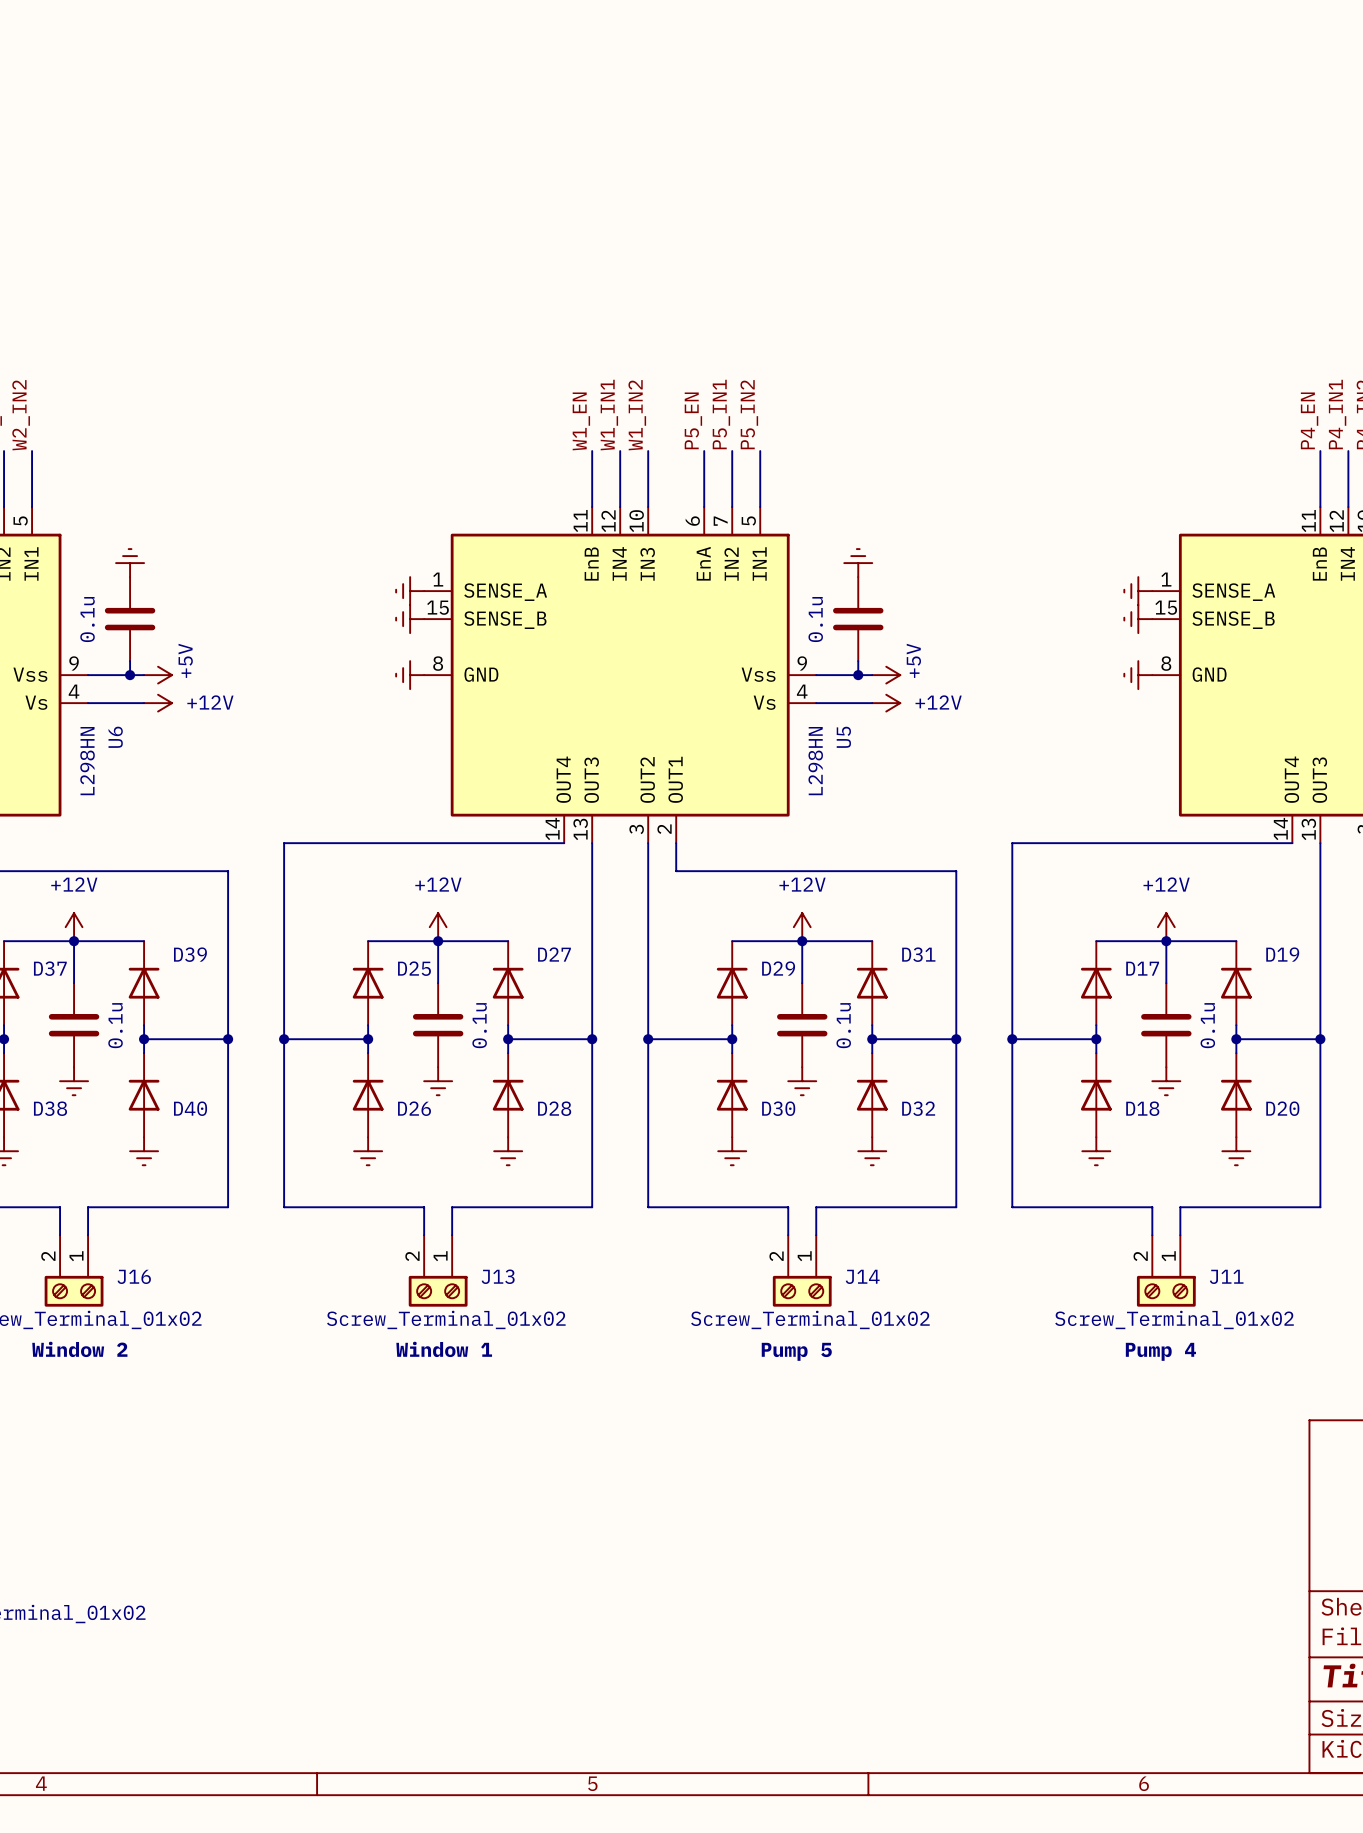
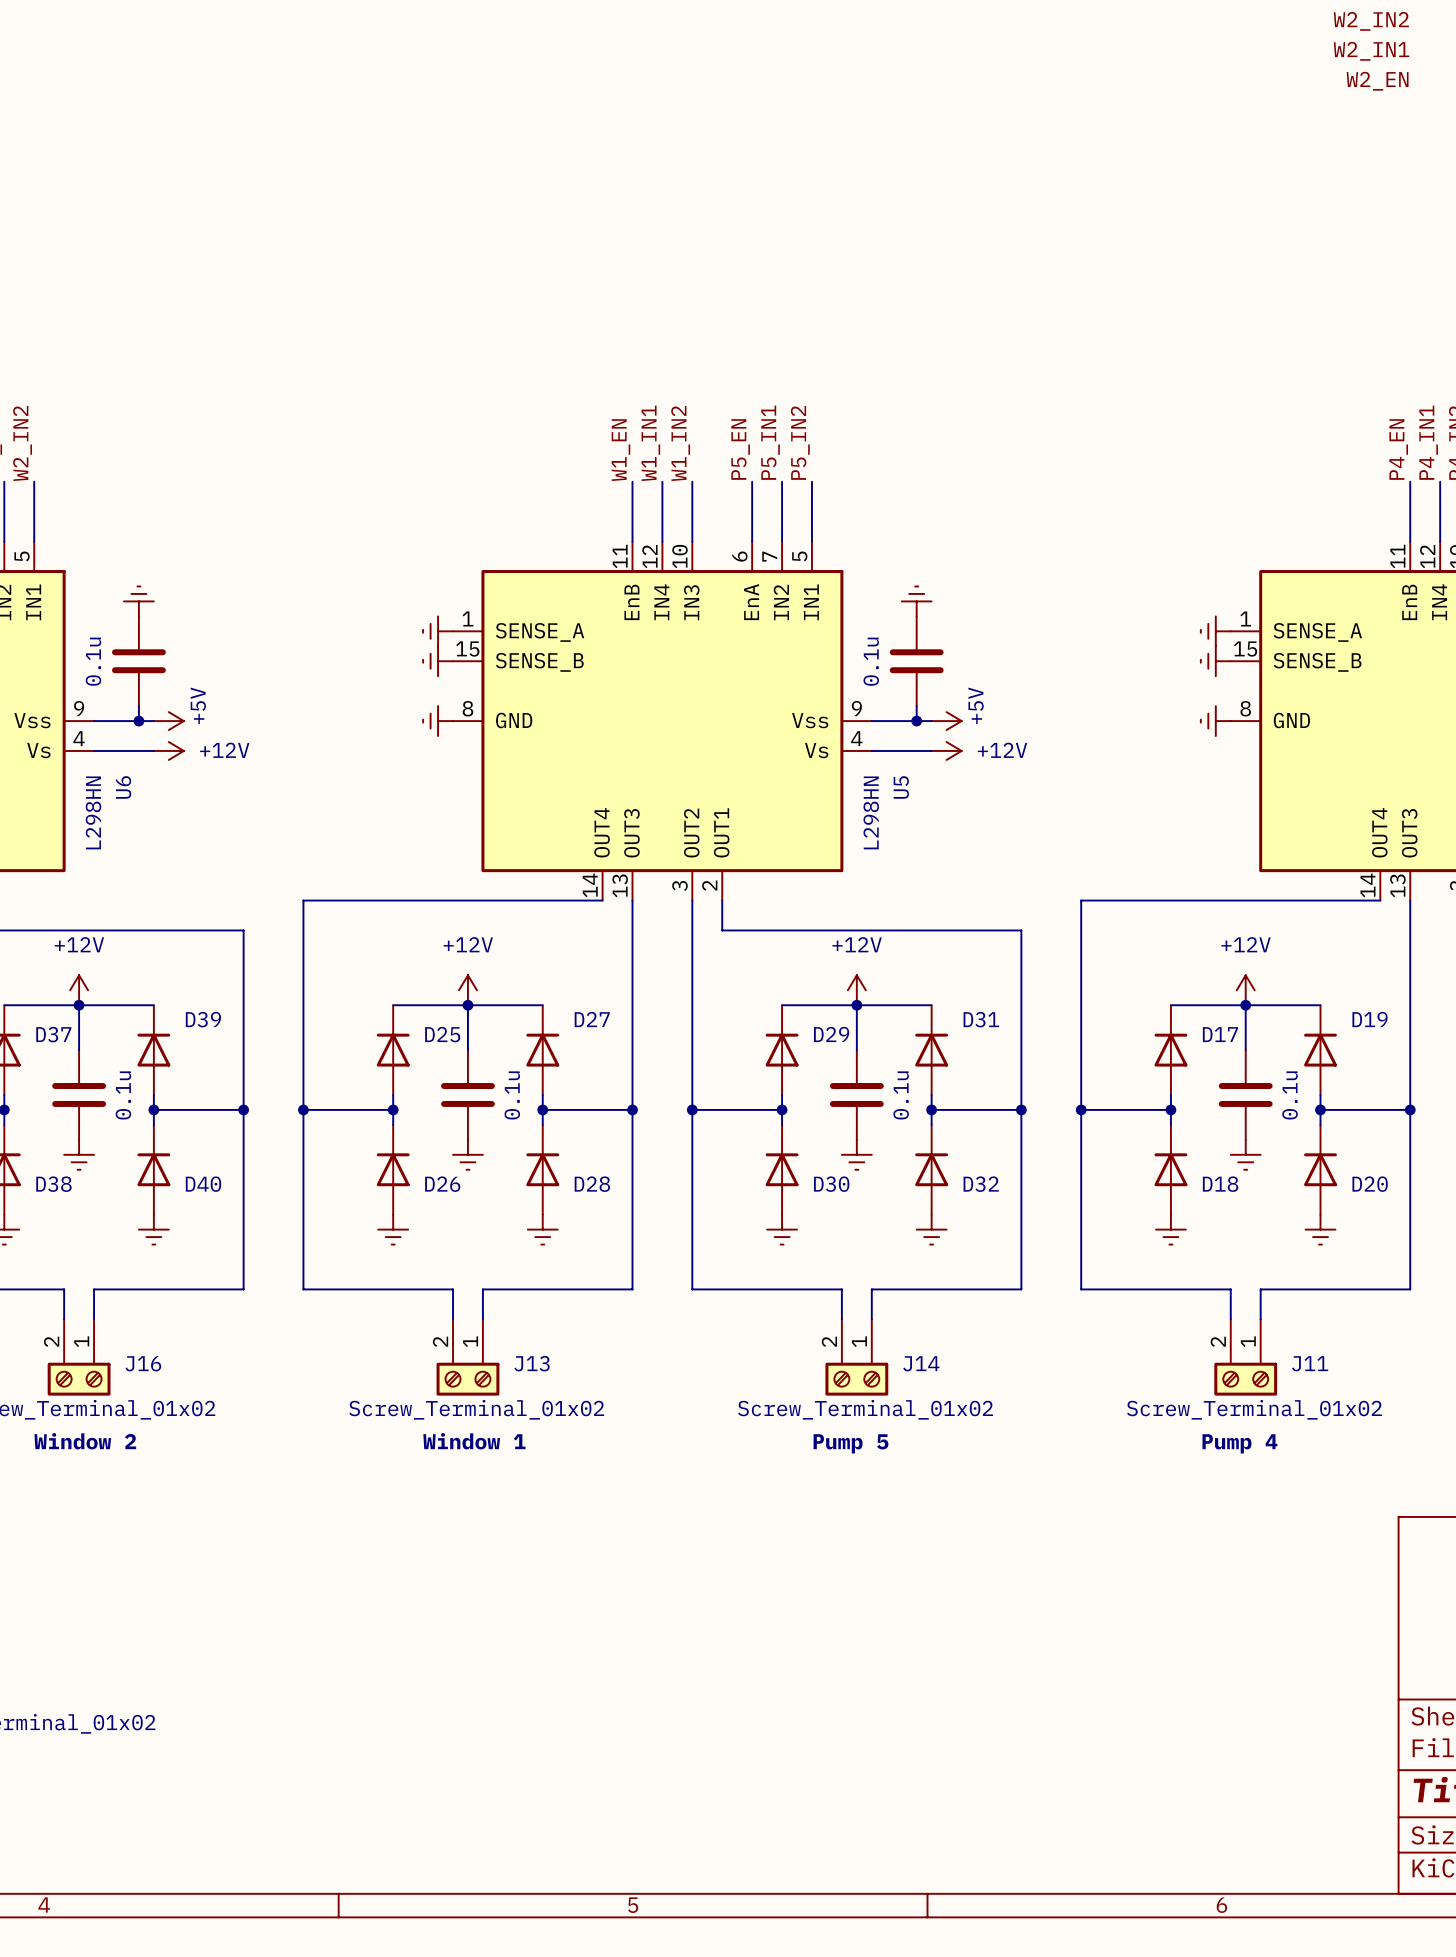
label: none -> W2_IN2 (1371, 21)
label: none -> W2_IN1 (1371, 51)
label: none -> W2_EN (1377, 81)

